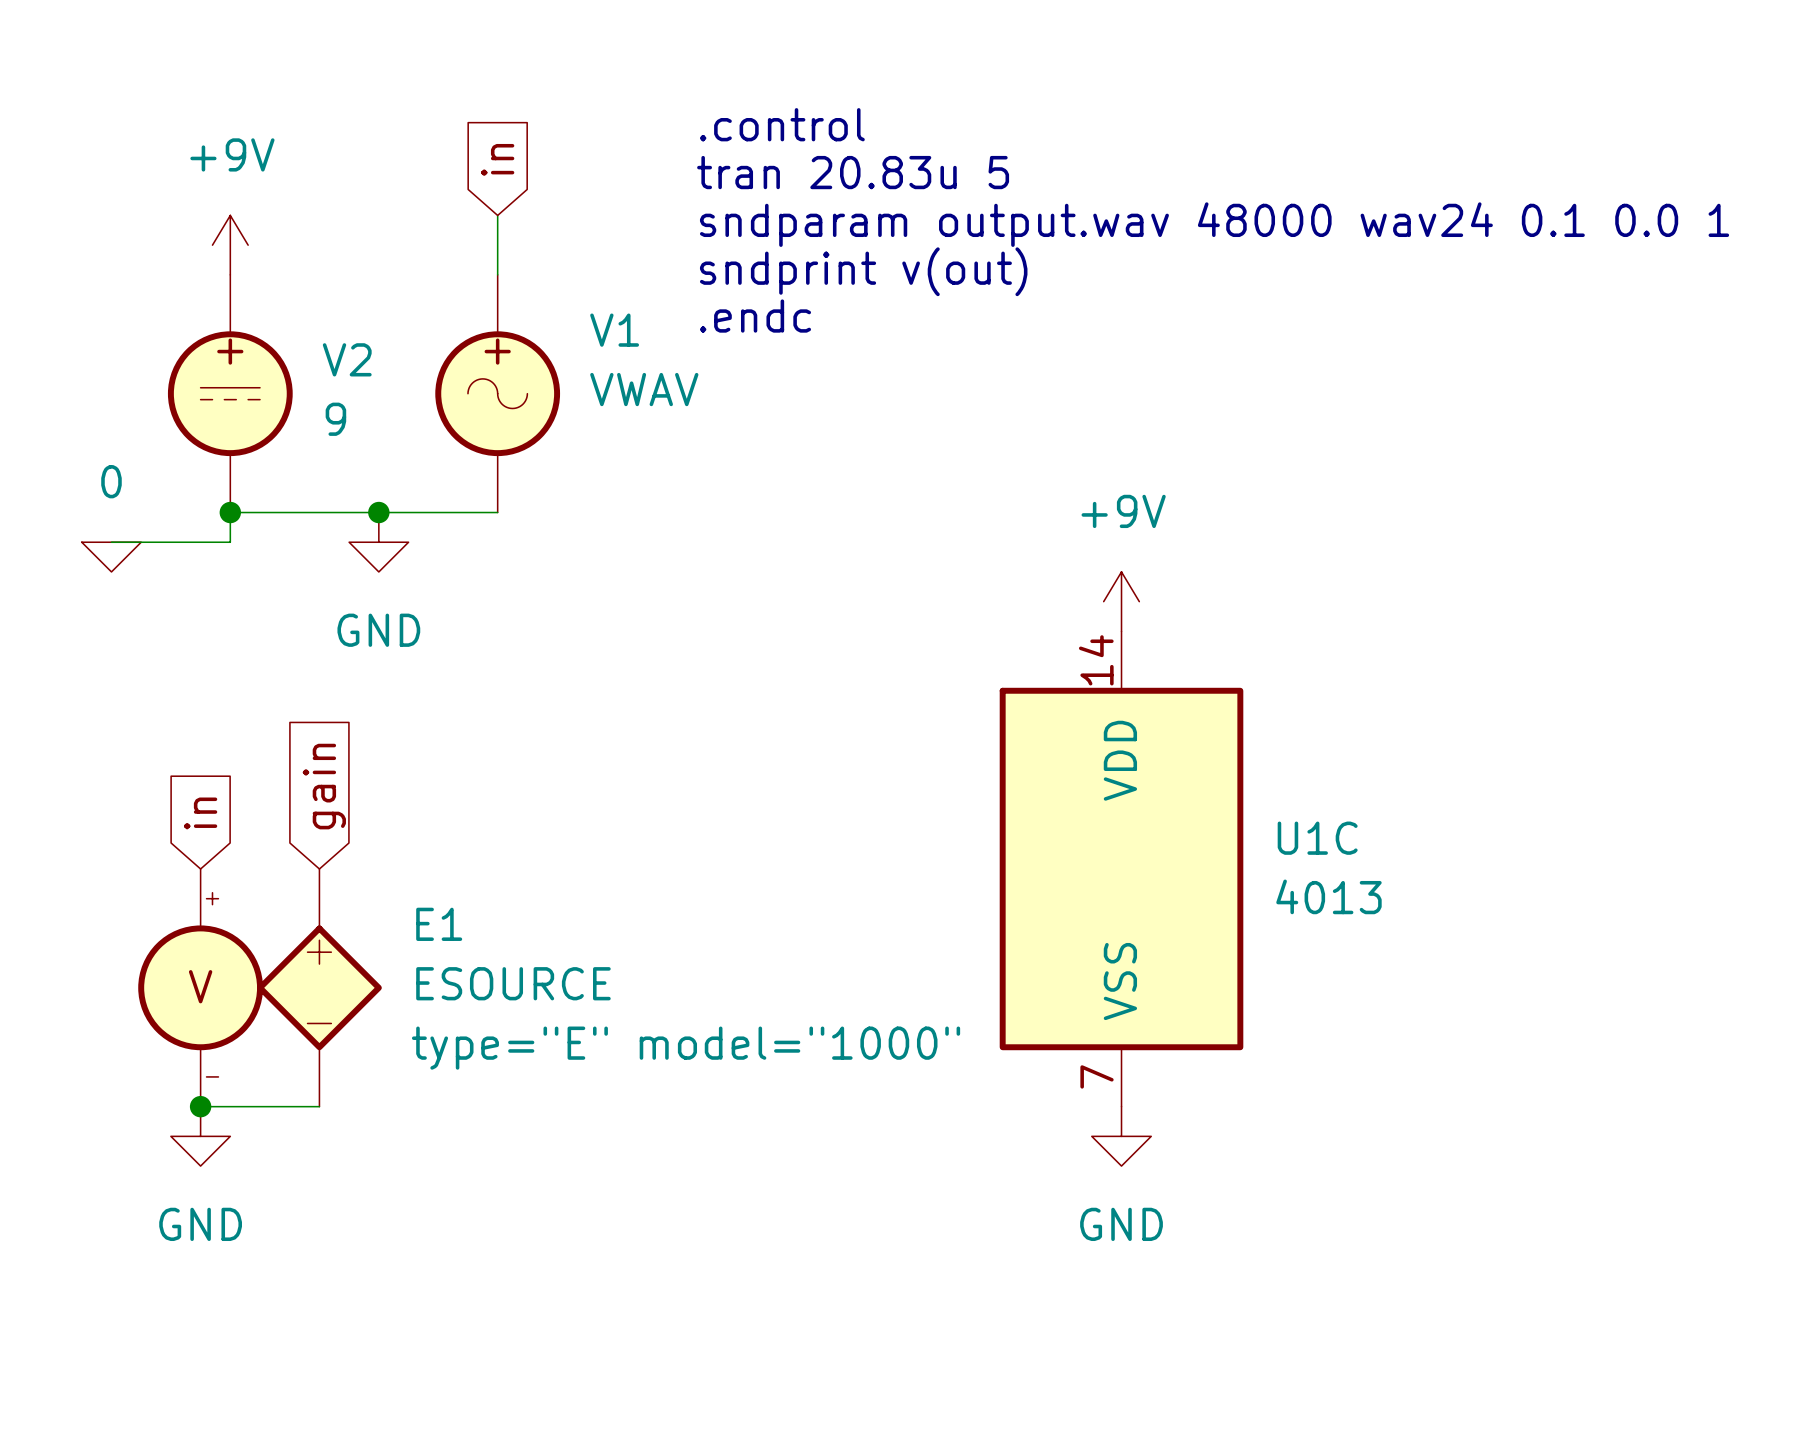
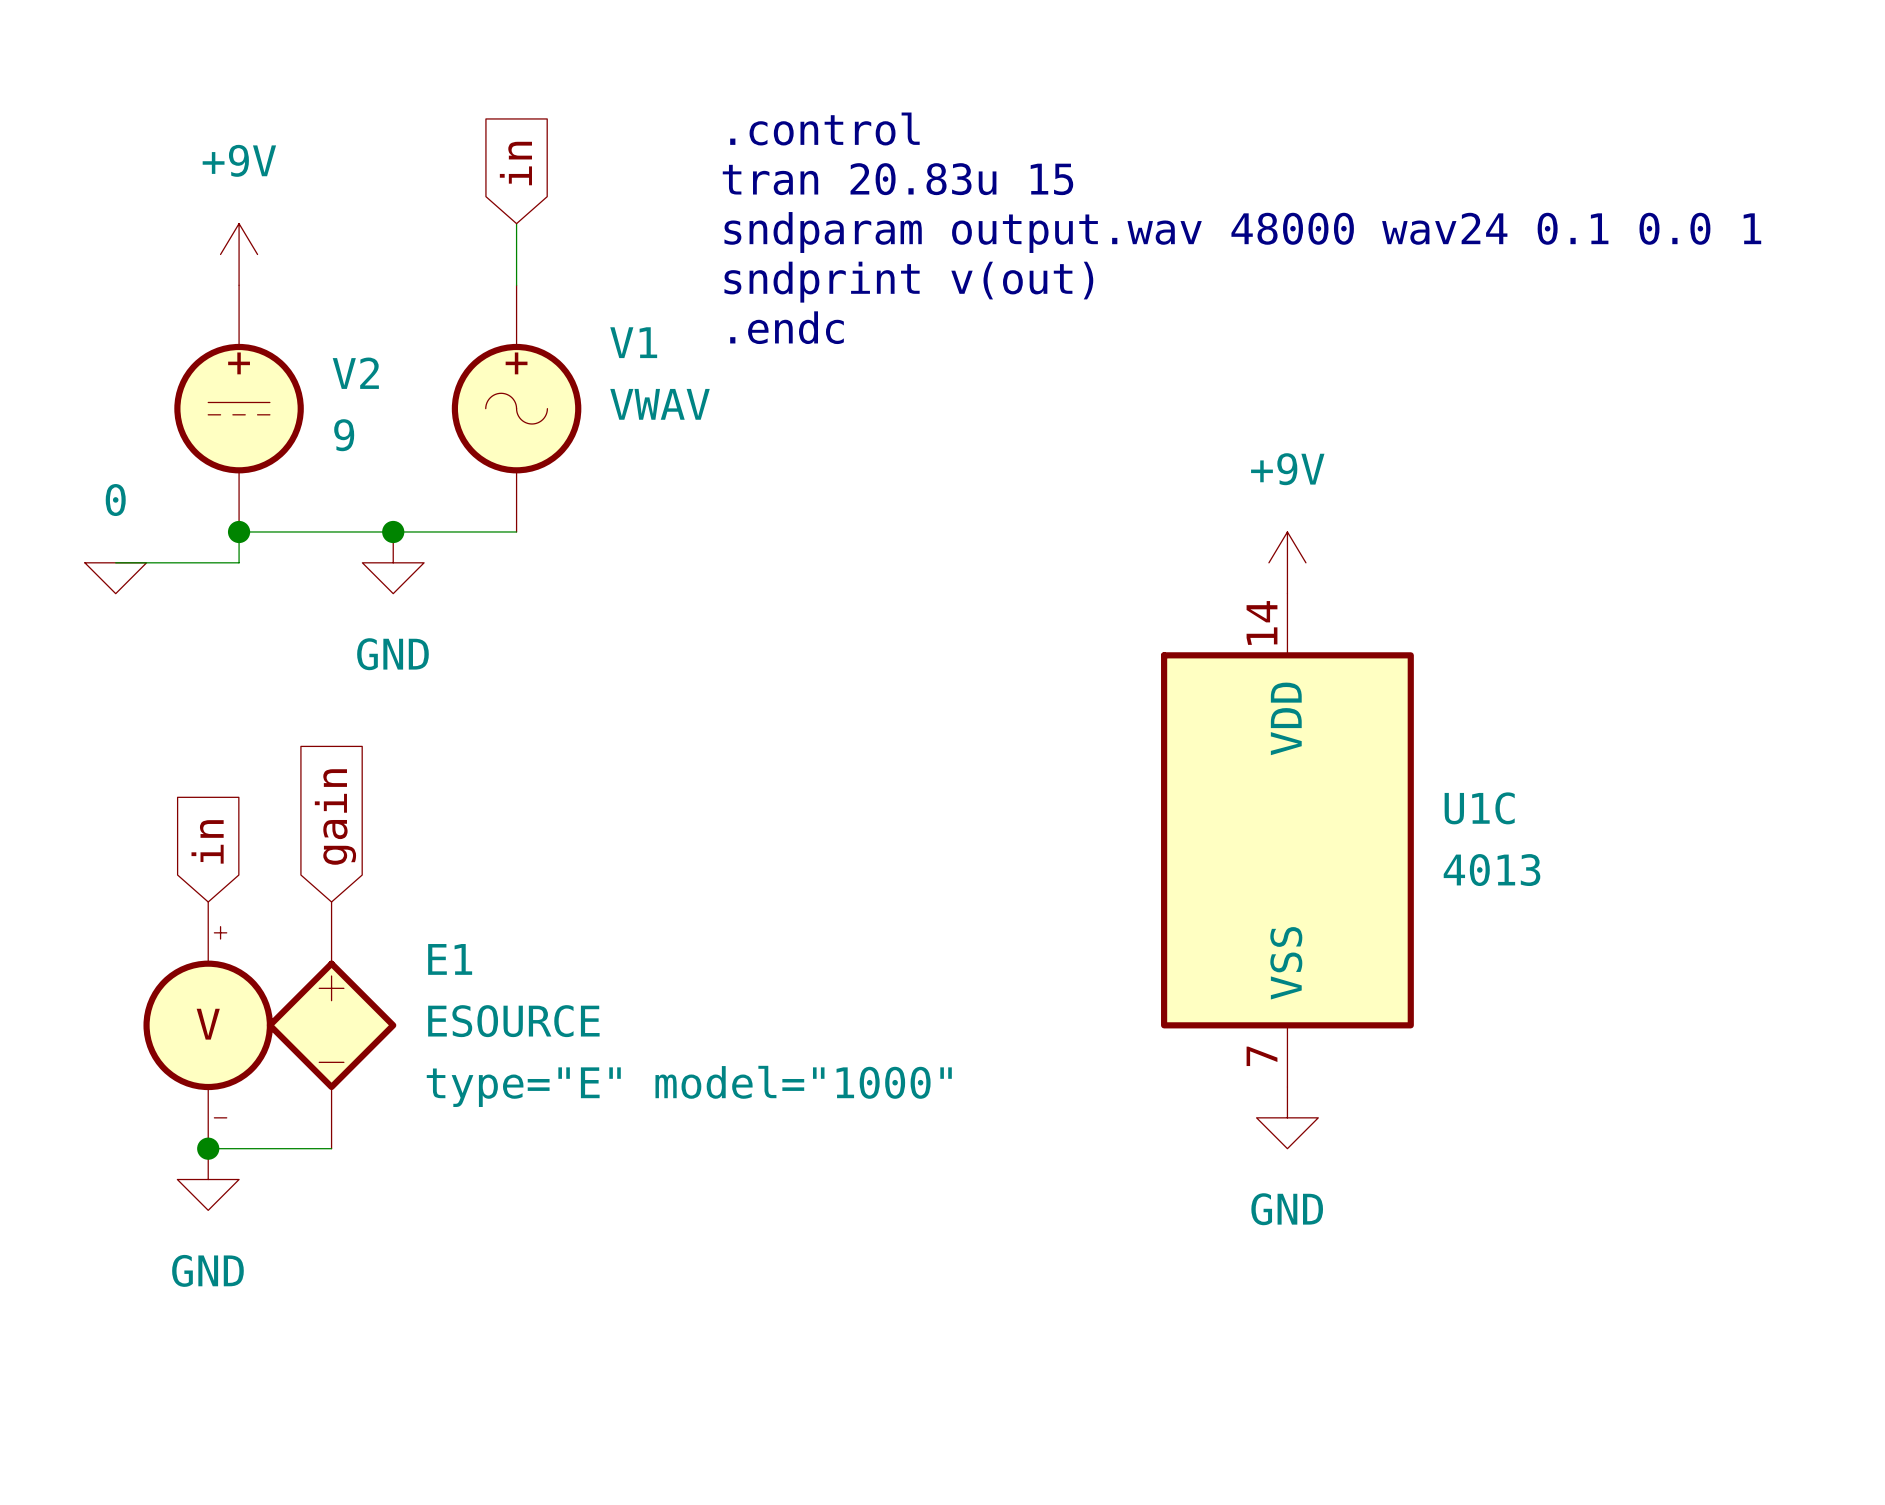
text: tran 20.83u 5 (853, 172) -> tran 20.83u 15 (897, 179)
power symbol position: +9V (1121, 601) -> +9V (1287, 562)
U1C position: (1121, 869) -> (1287, 840)
power symbol position: GND (1121, 1136) -> GND (1287, 1117)

